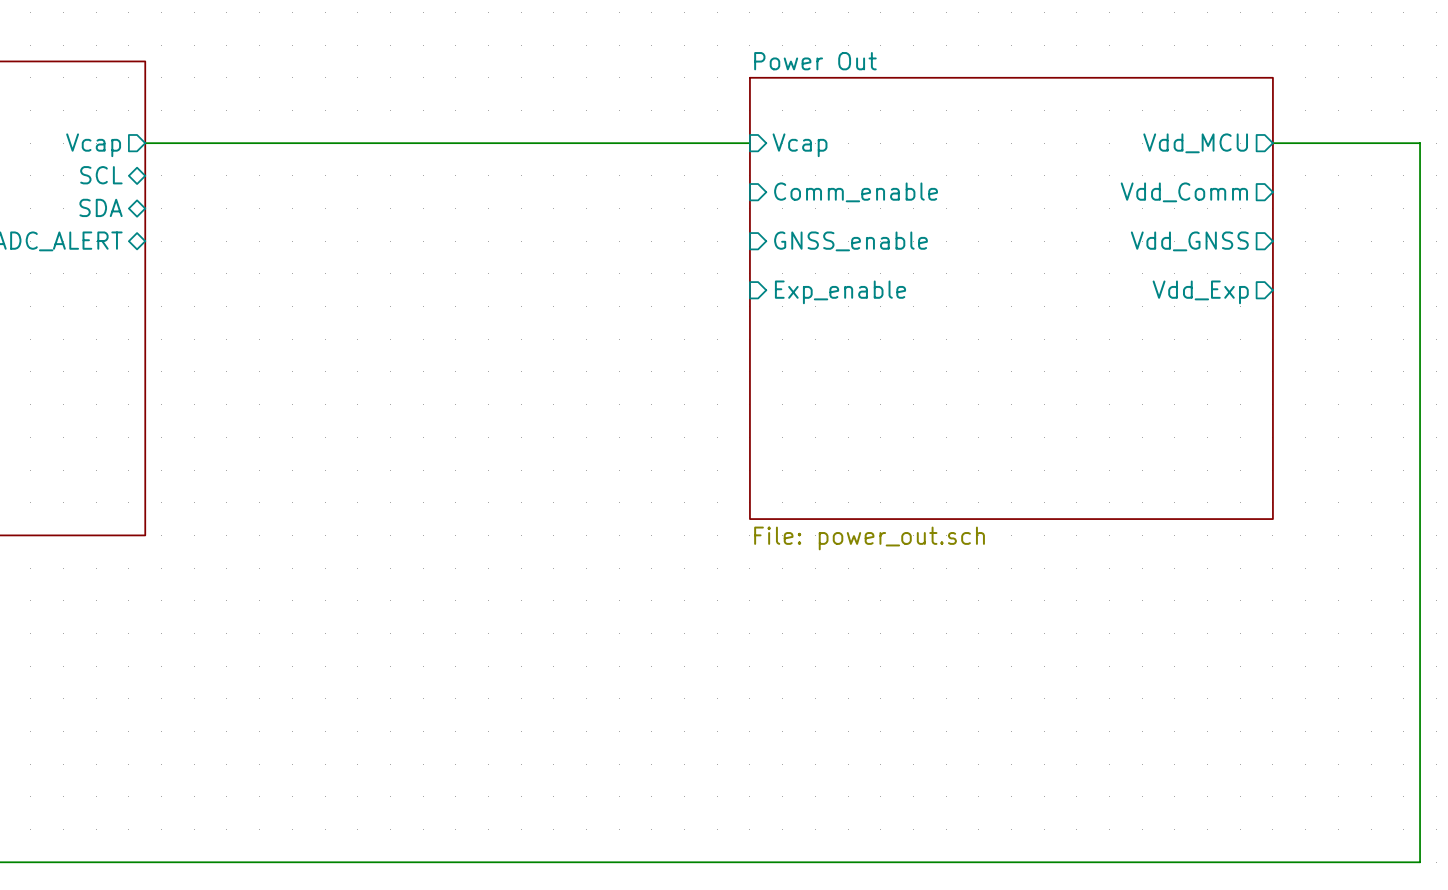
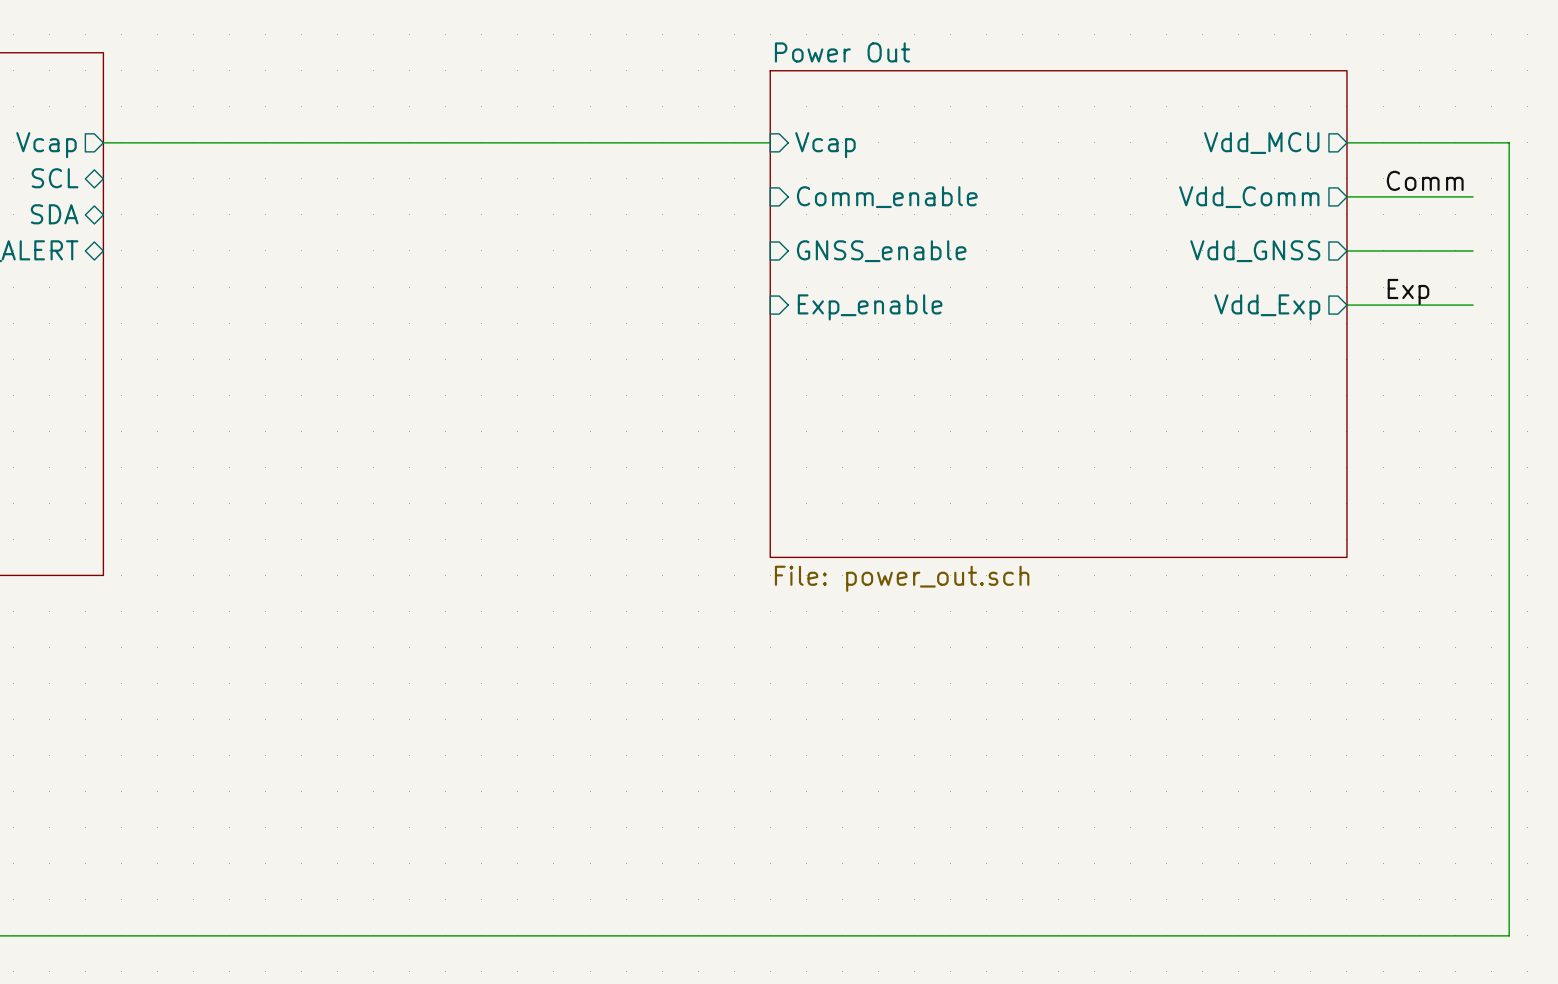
label: none -> Comm (1425, 180)
wire: none -> (1346, 196) (1473, 196)
wire: none -> (1346, 250) (1473, 250)
label: none -> Exp (1408, 291)
wire: none -> (1346, 305) (1473, 305)

